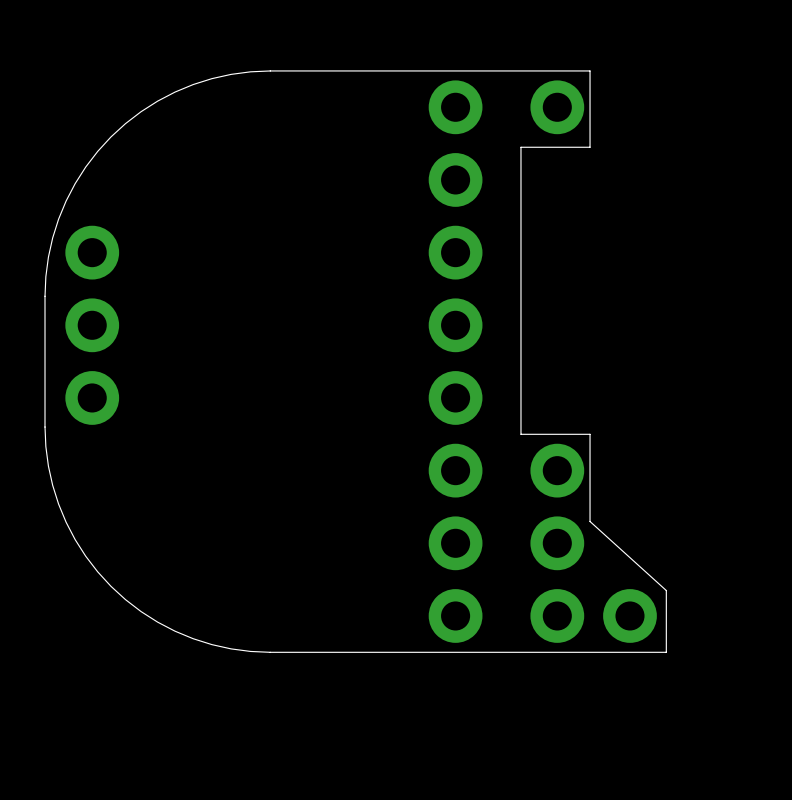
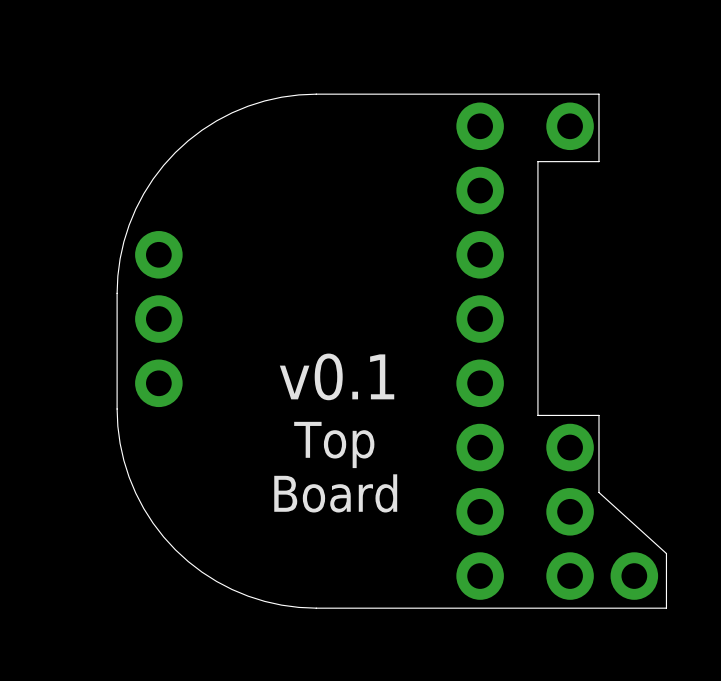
text: none -> v0.1 (337, 376)
text: none -> Top (334, 444)
text: none -> Board (335, 493)

